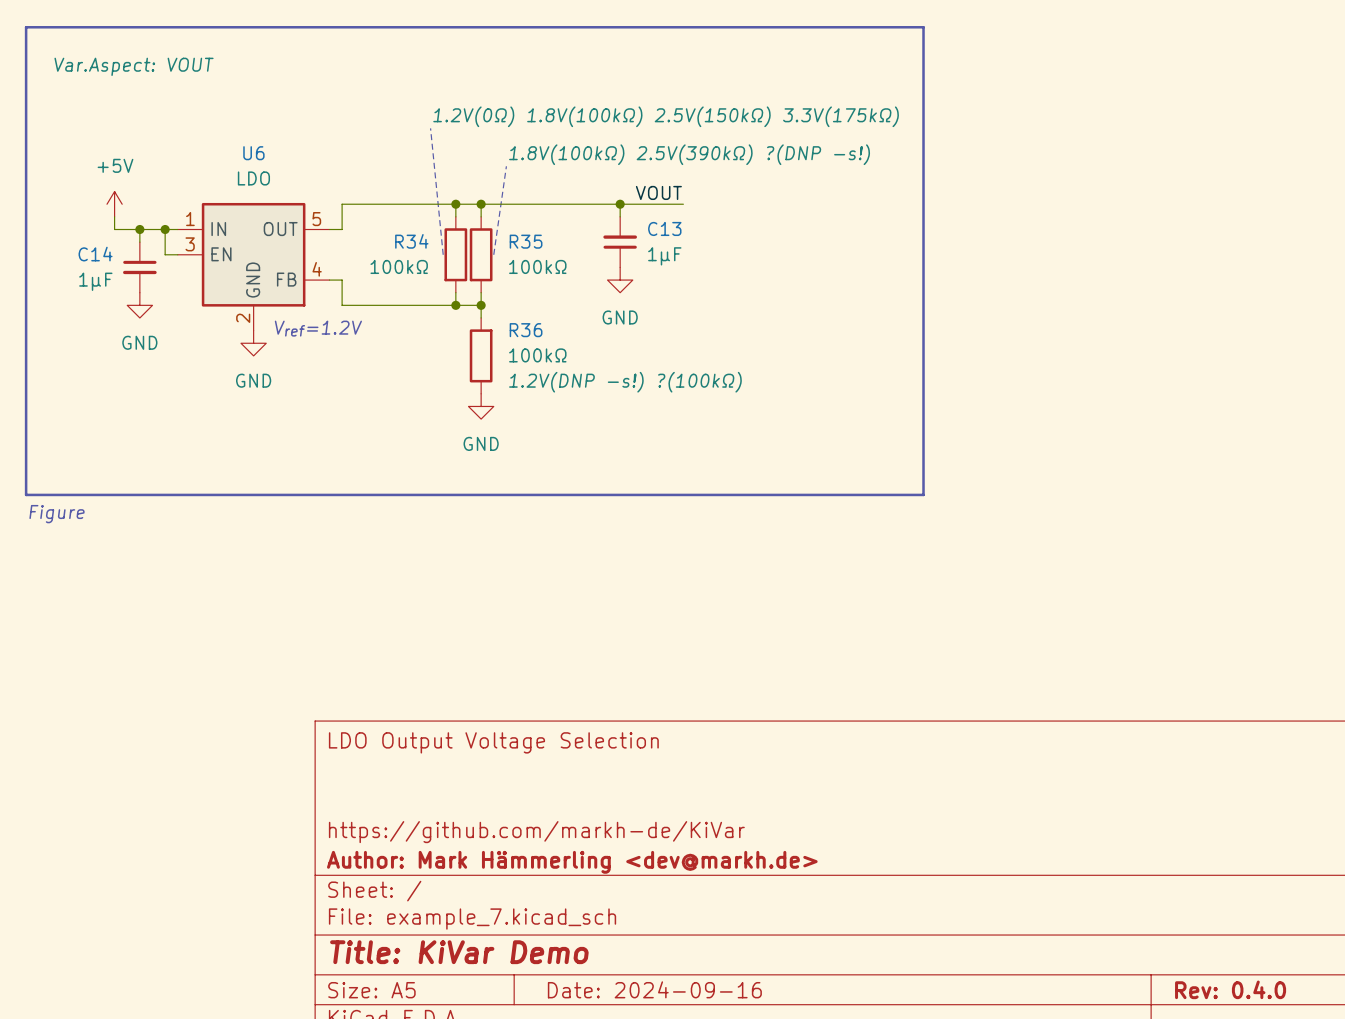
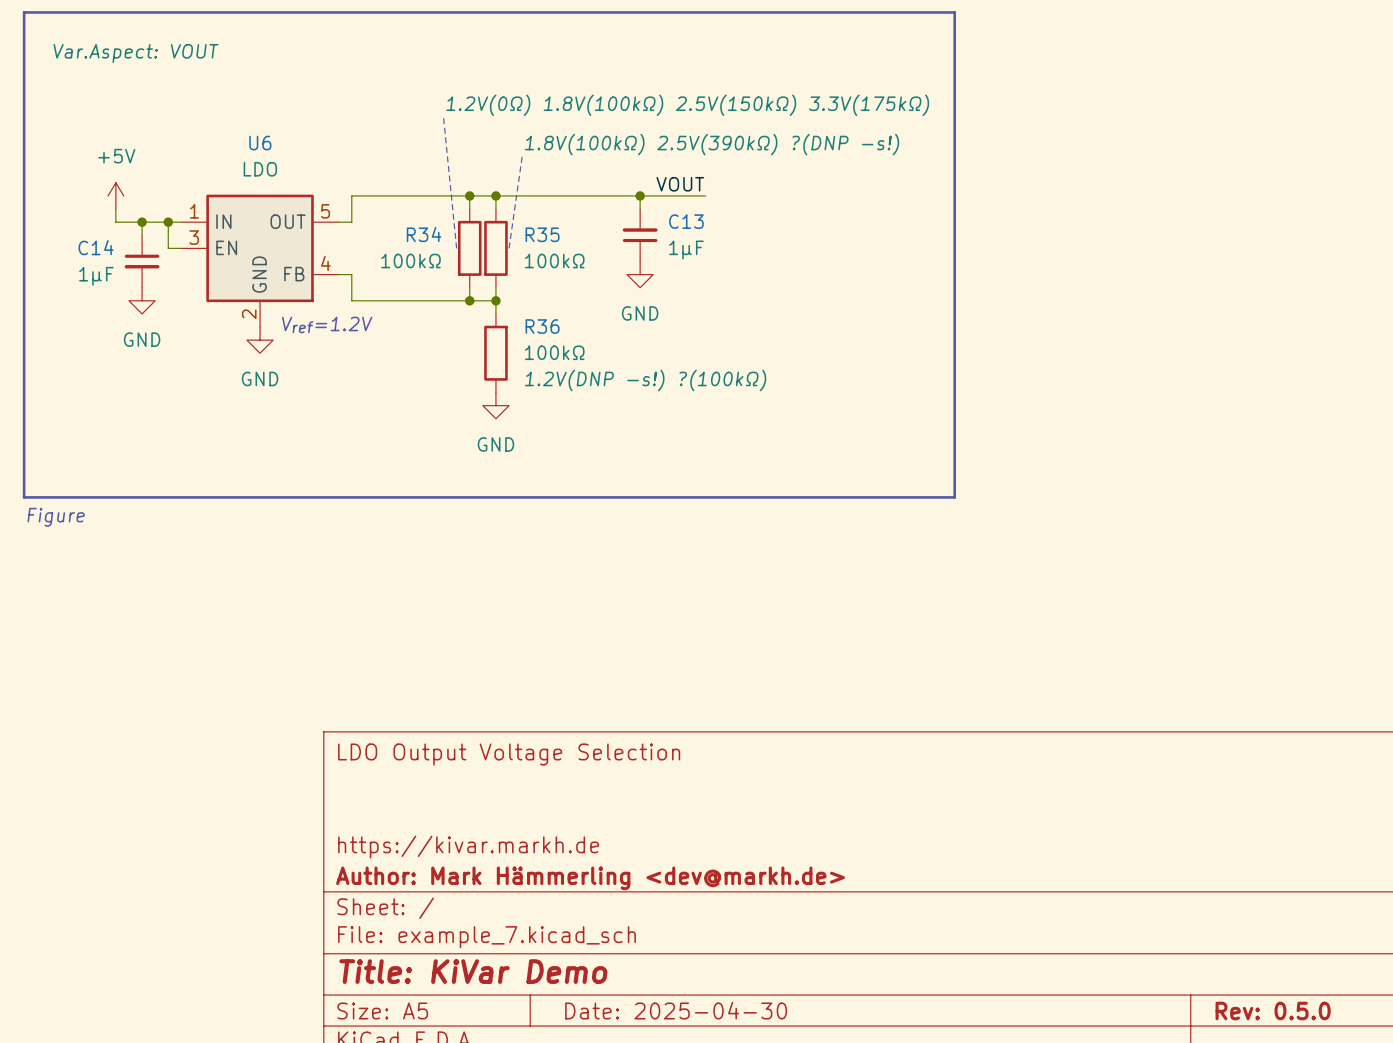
title block: https://github.com/markh-de/KiVar (536, 832) -> https://kivar.markh.de (468, 847)
title block: Date: 2024-09-16 (654, 989) -> Date: 2025-04-30 (676, 1010)
title block: Rev: 0.4.0 (1230, 989) -> Rev: 0.5.0 (1273, 1010)

